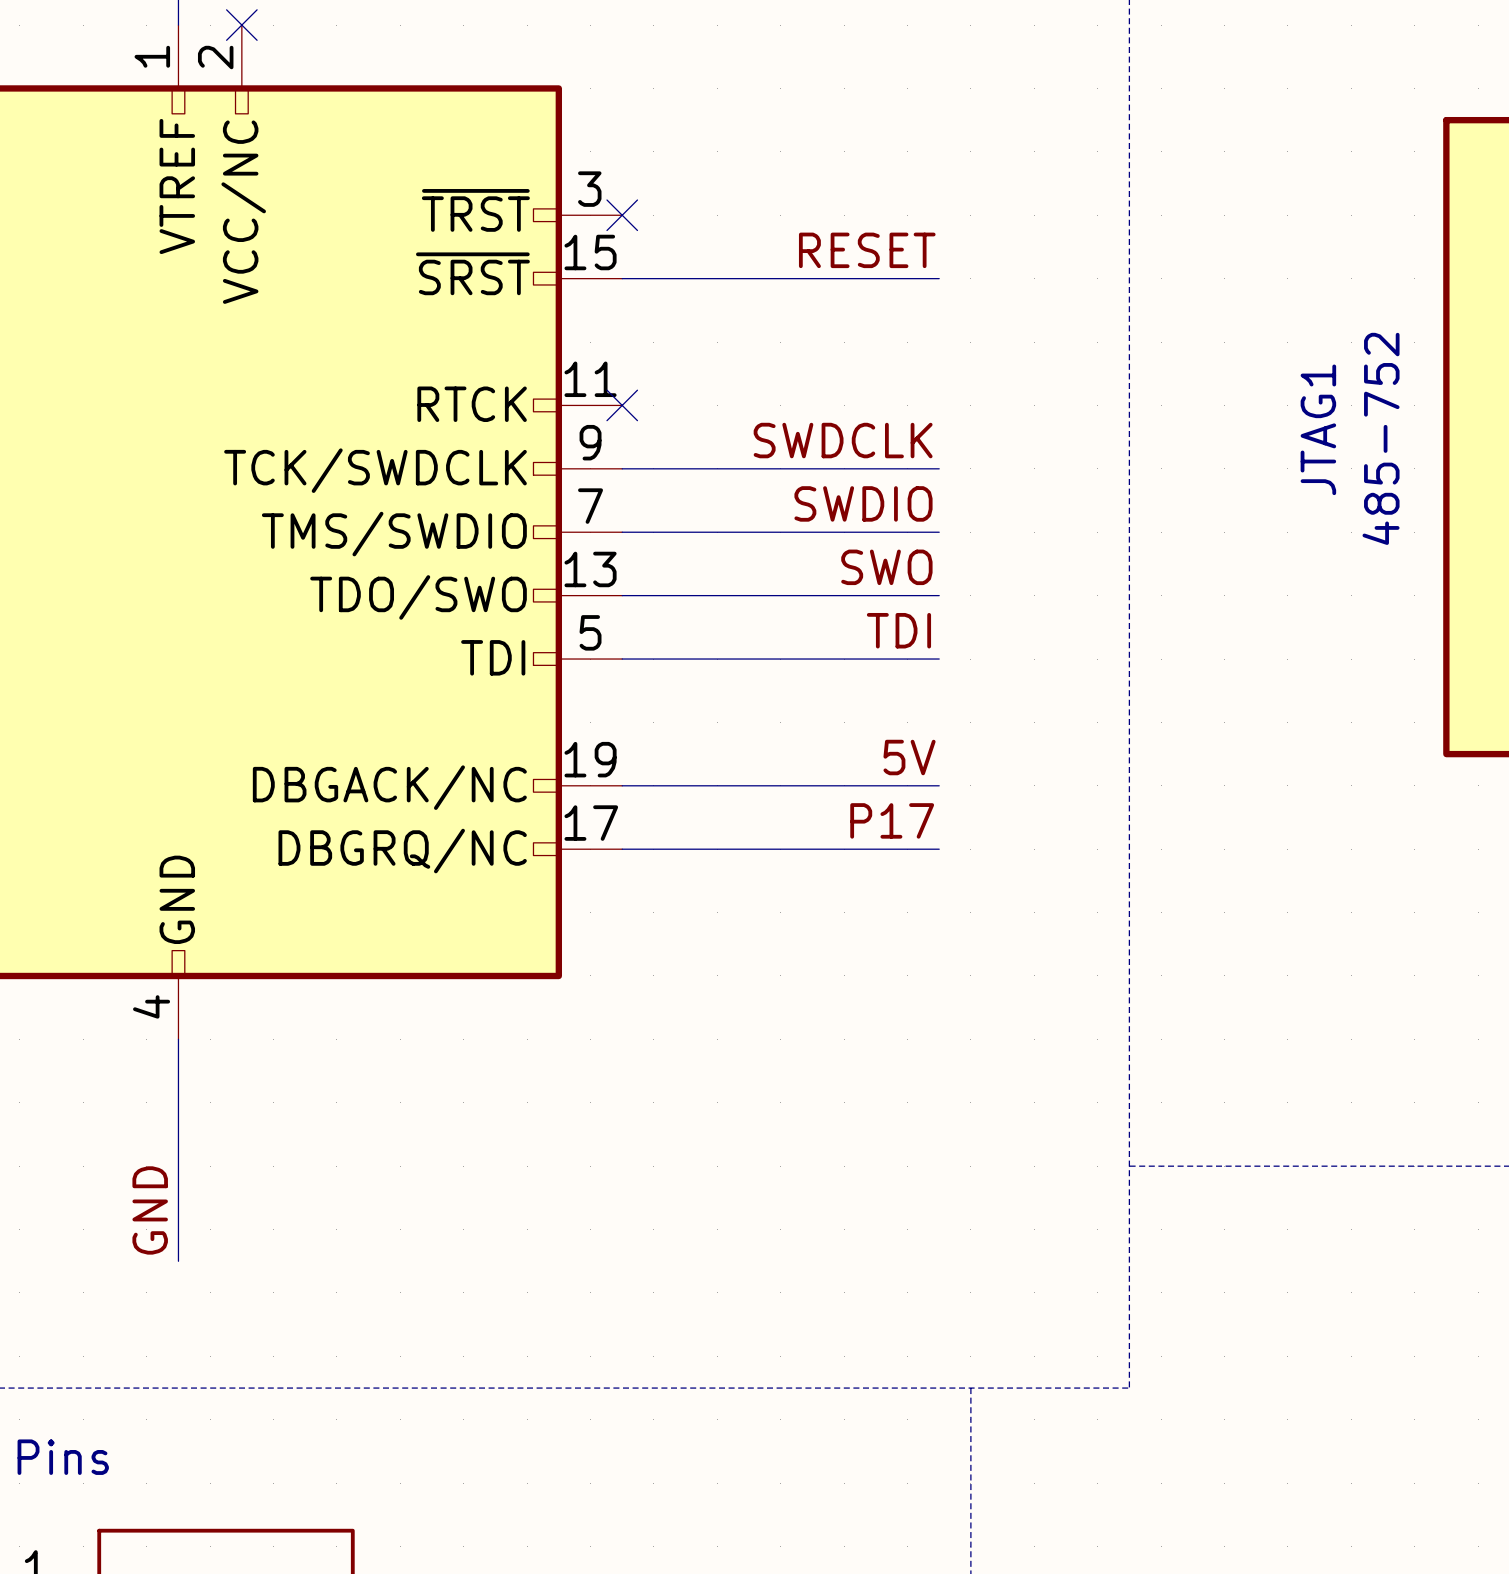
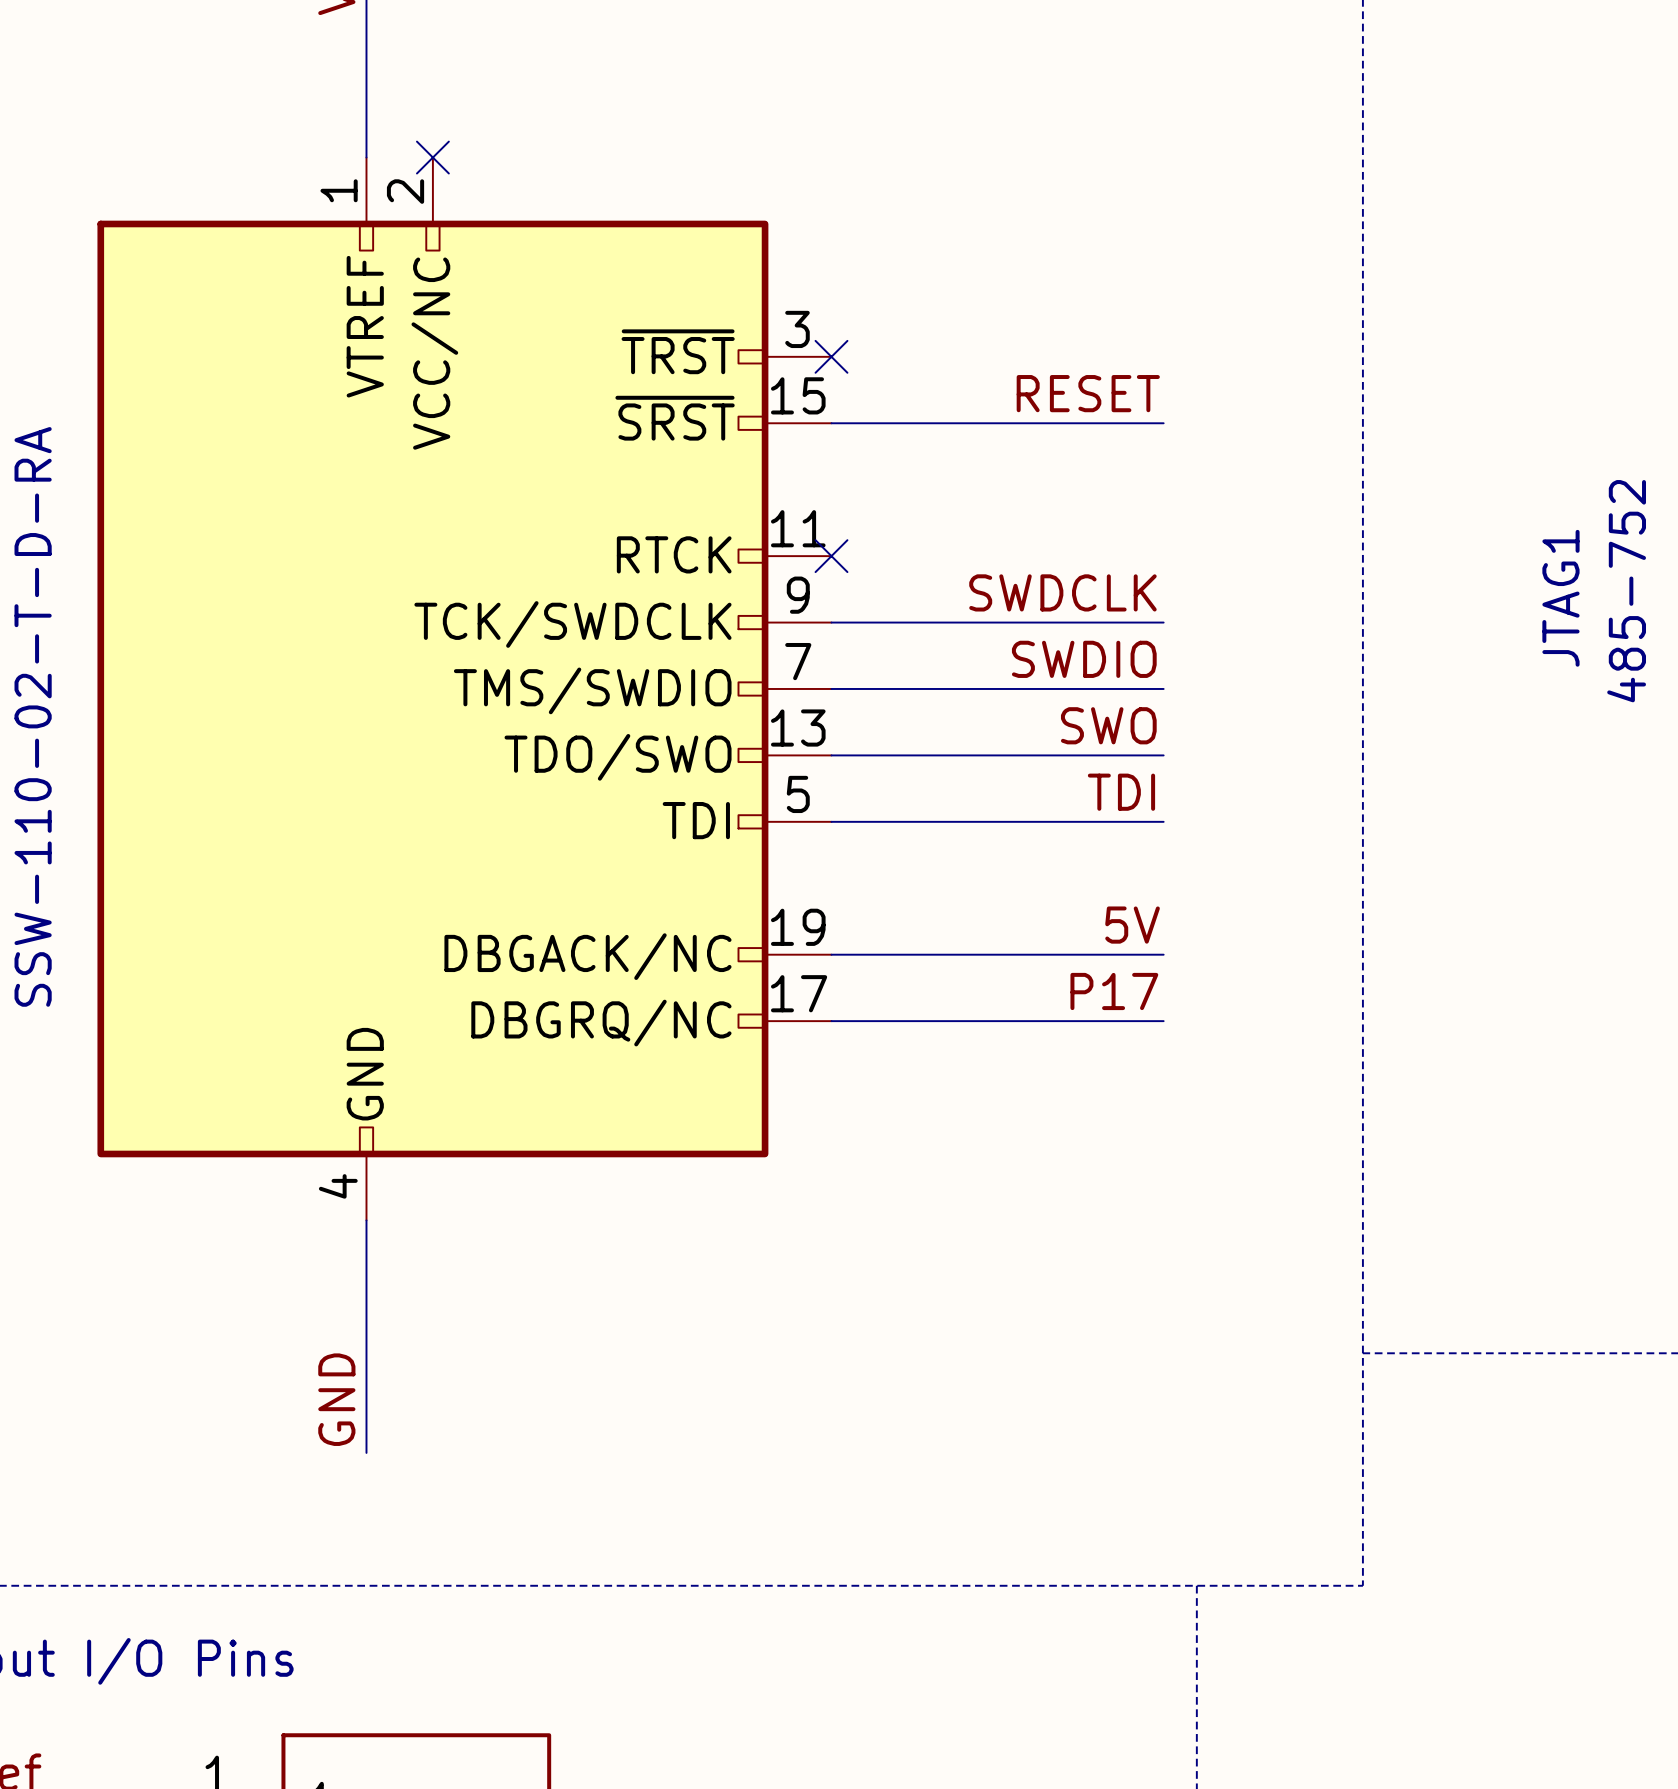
JTAG1 name position: JTAG1 (1318, 429) -> JTAG1 (1560, 598)

